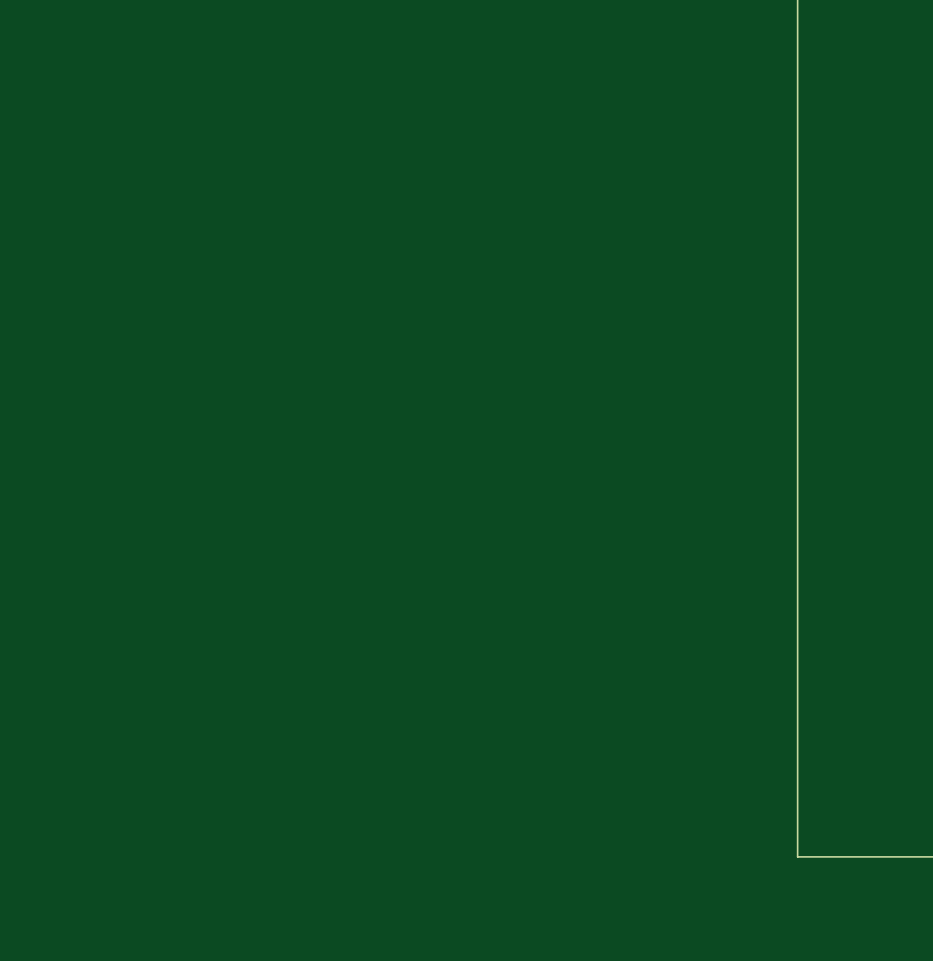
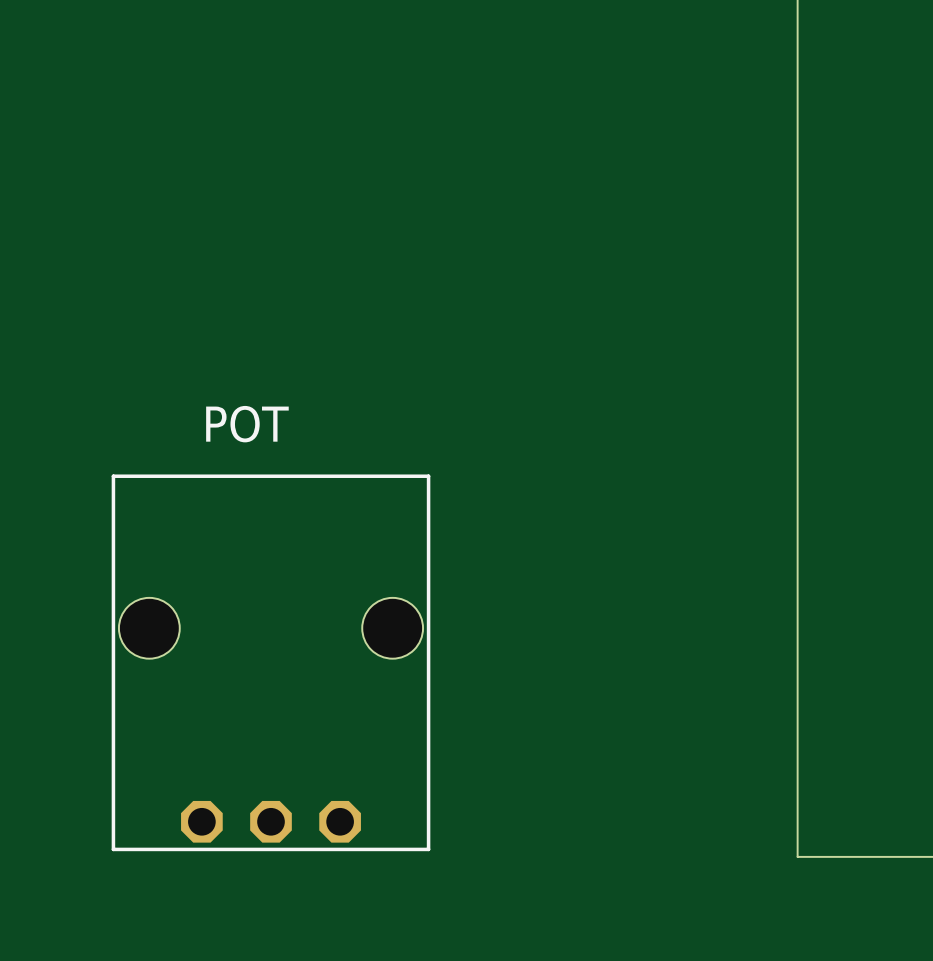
POT: none -> (271, 662)

